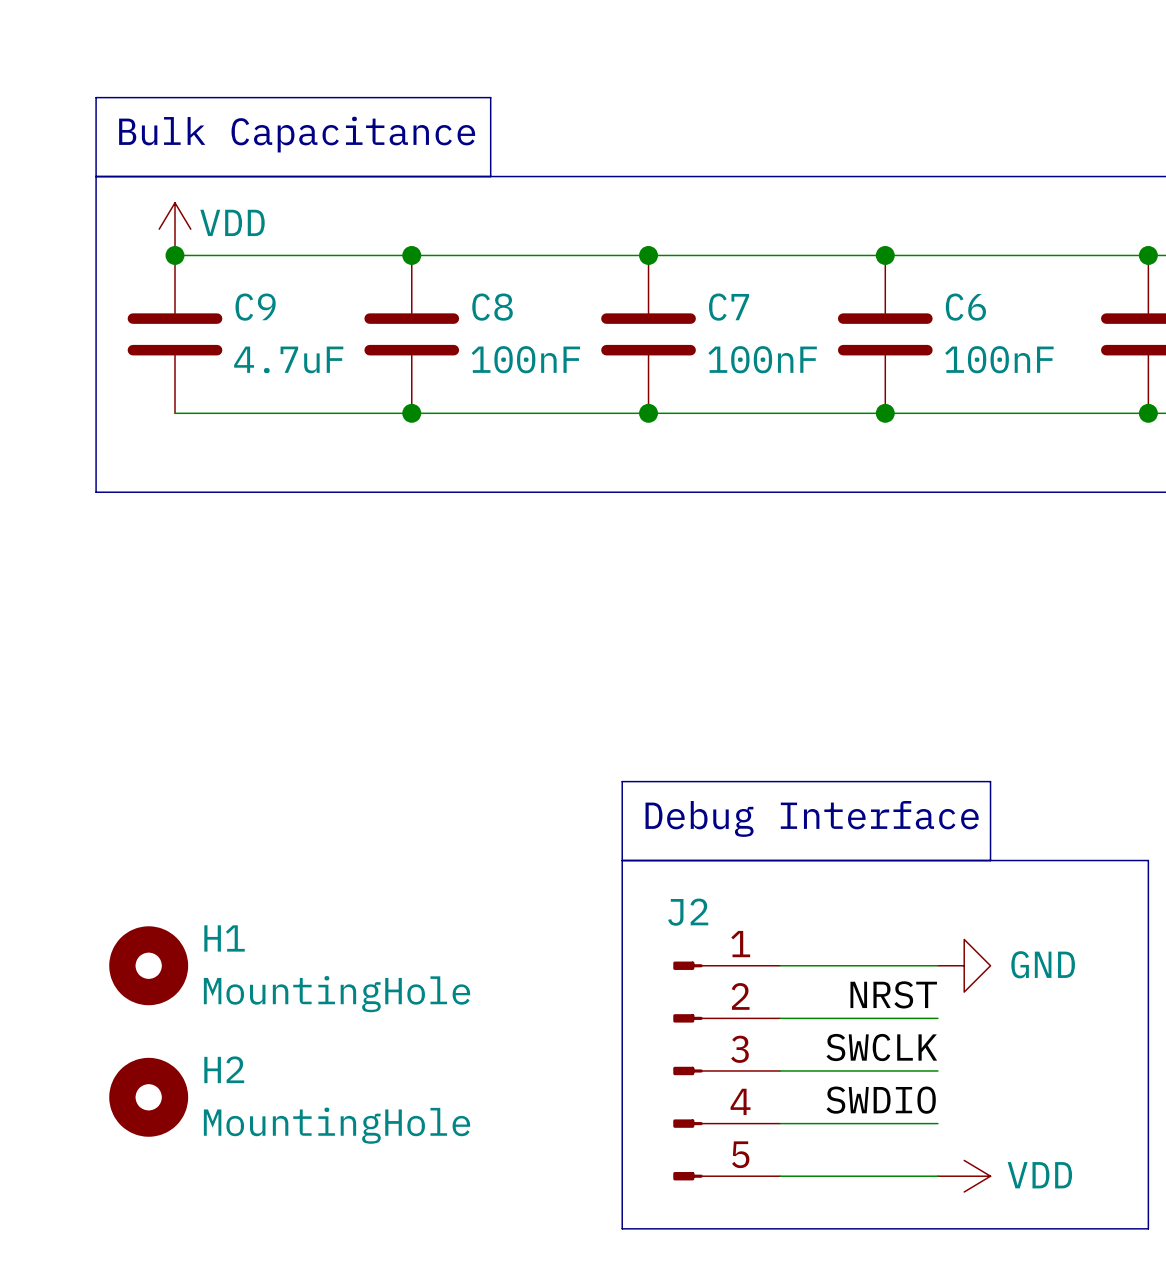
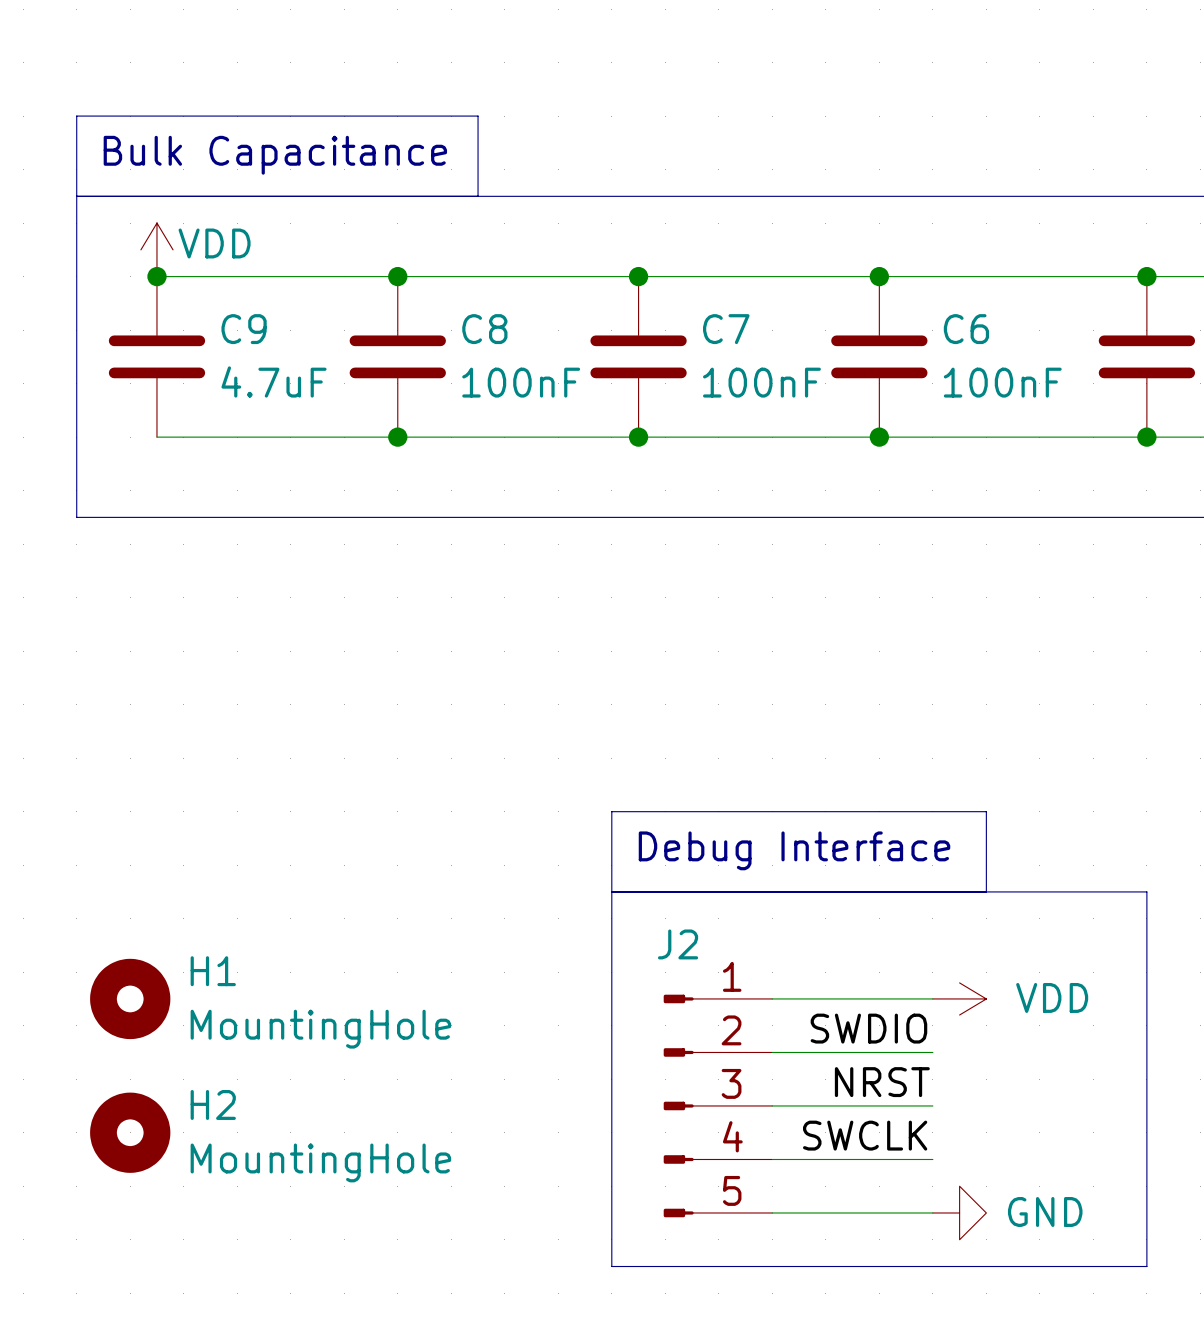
power symbol: GND (964, 965) -> VDD (959, 998)
label: NRST (893, 994) -> SWDIO (868, 1028)
label: SWCLK (881, 1047) -> NRST (882, 1082)
label: SWDIO (881, 1100) -> SWCLK (865, 1135)
power symbol: VDD (964, 1176) -> GND (959, 1212)

